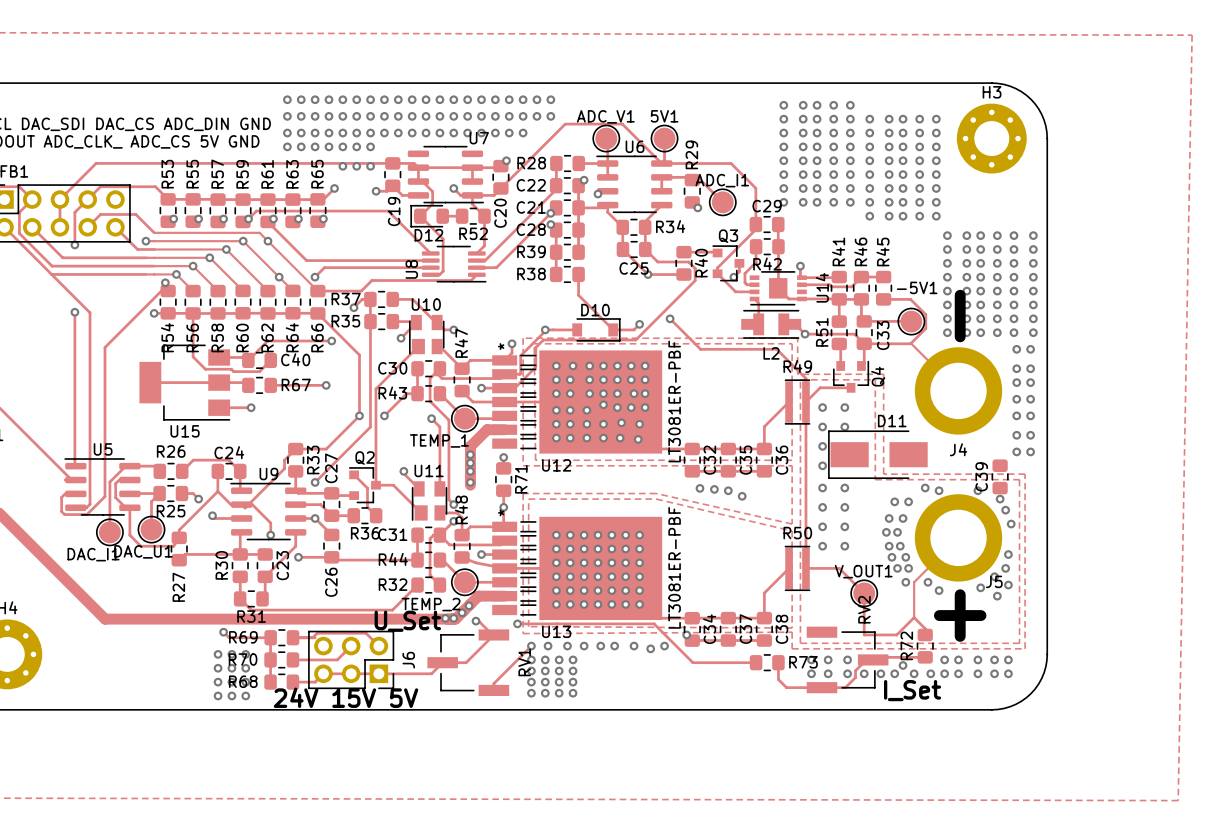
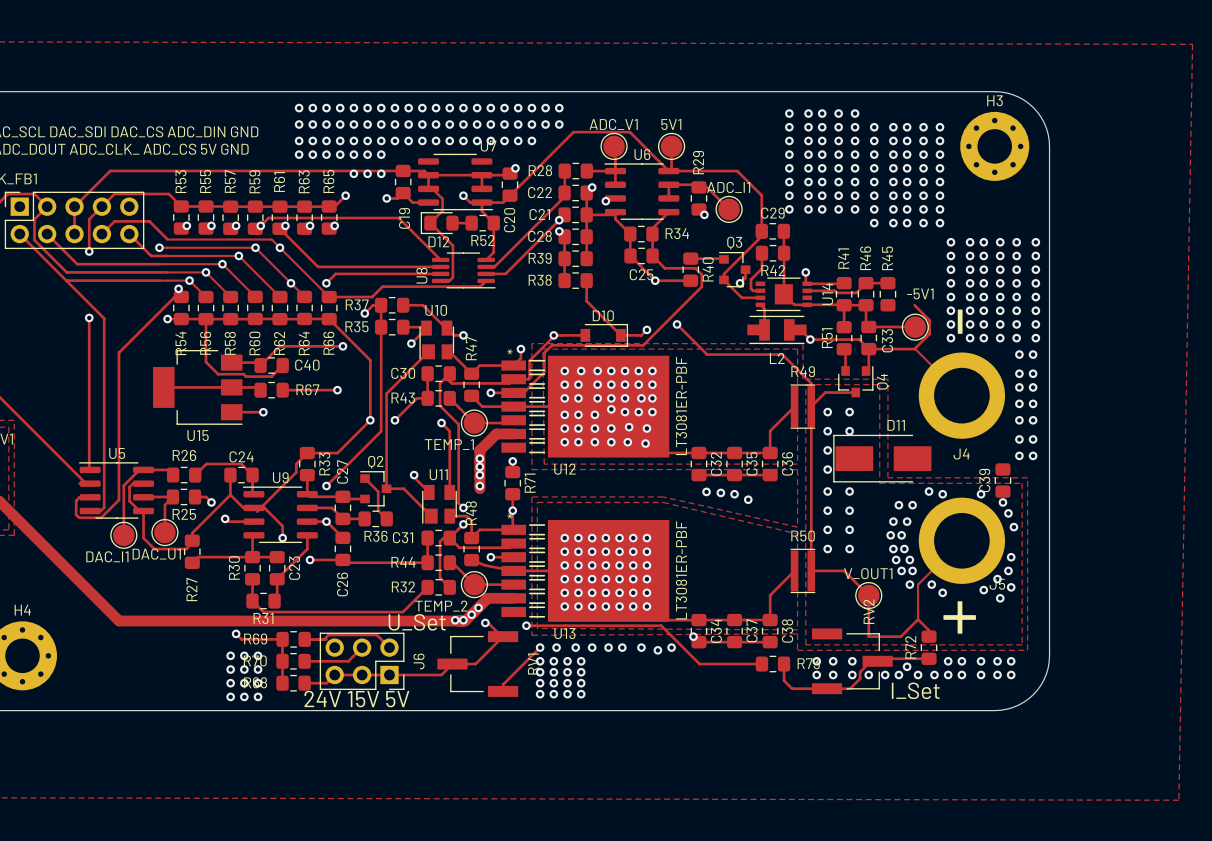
track: (883, 299) (910, 299) -> none

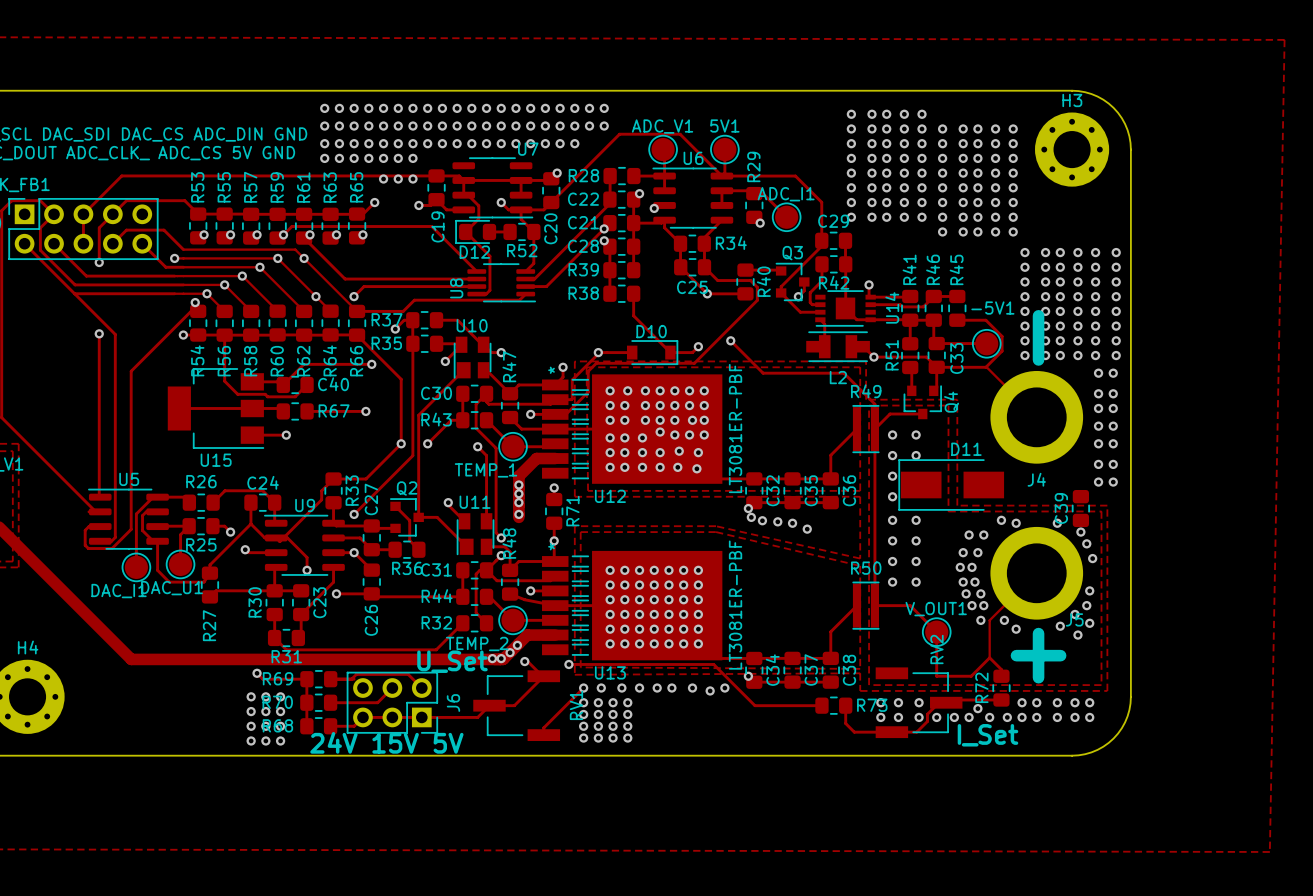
track: none -> (957, 320) (985, 320)
via: none -> (748, 508)
via: none -> (751, 517)

